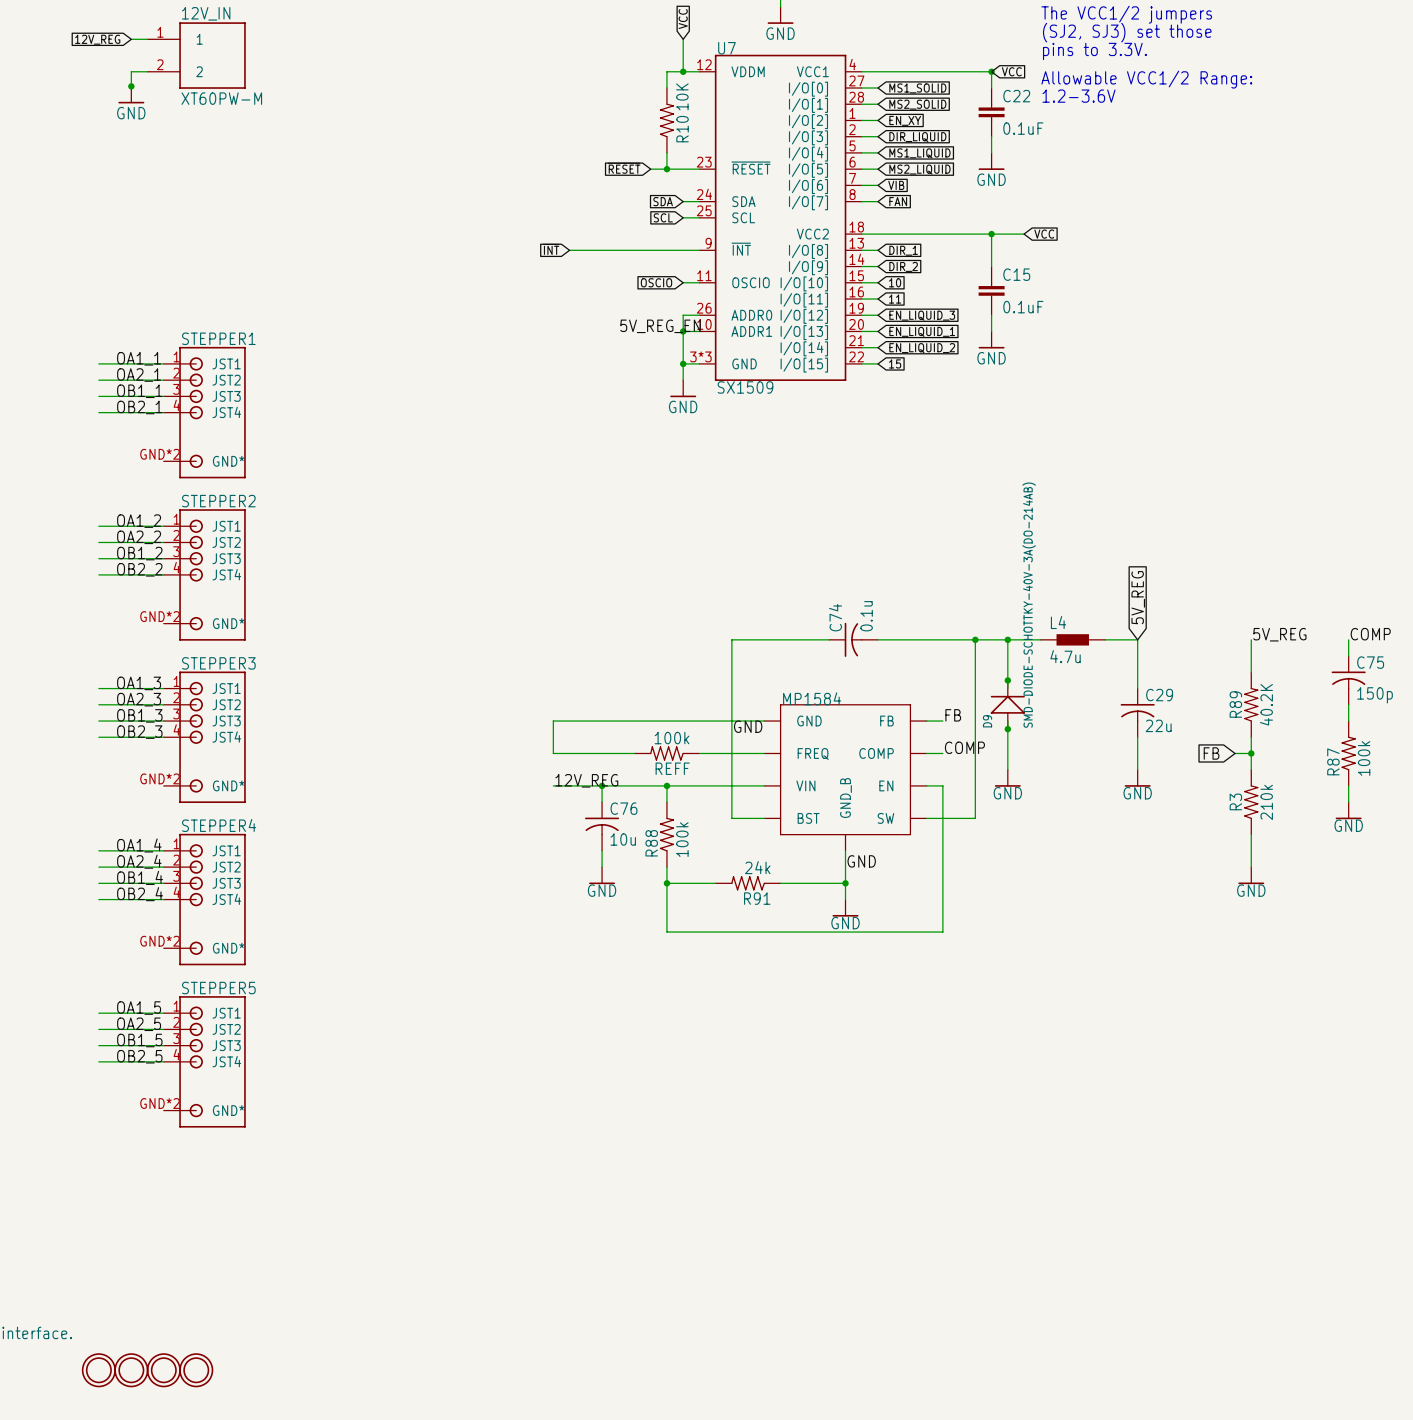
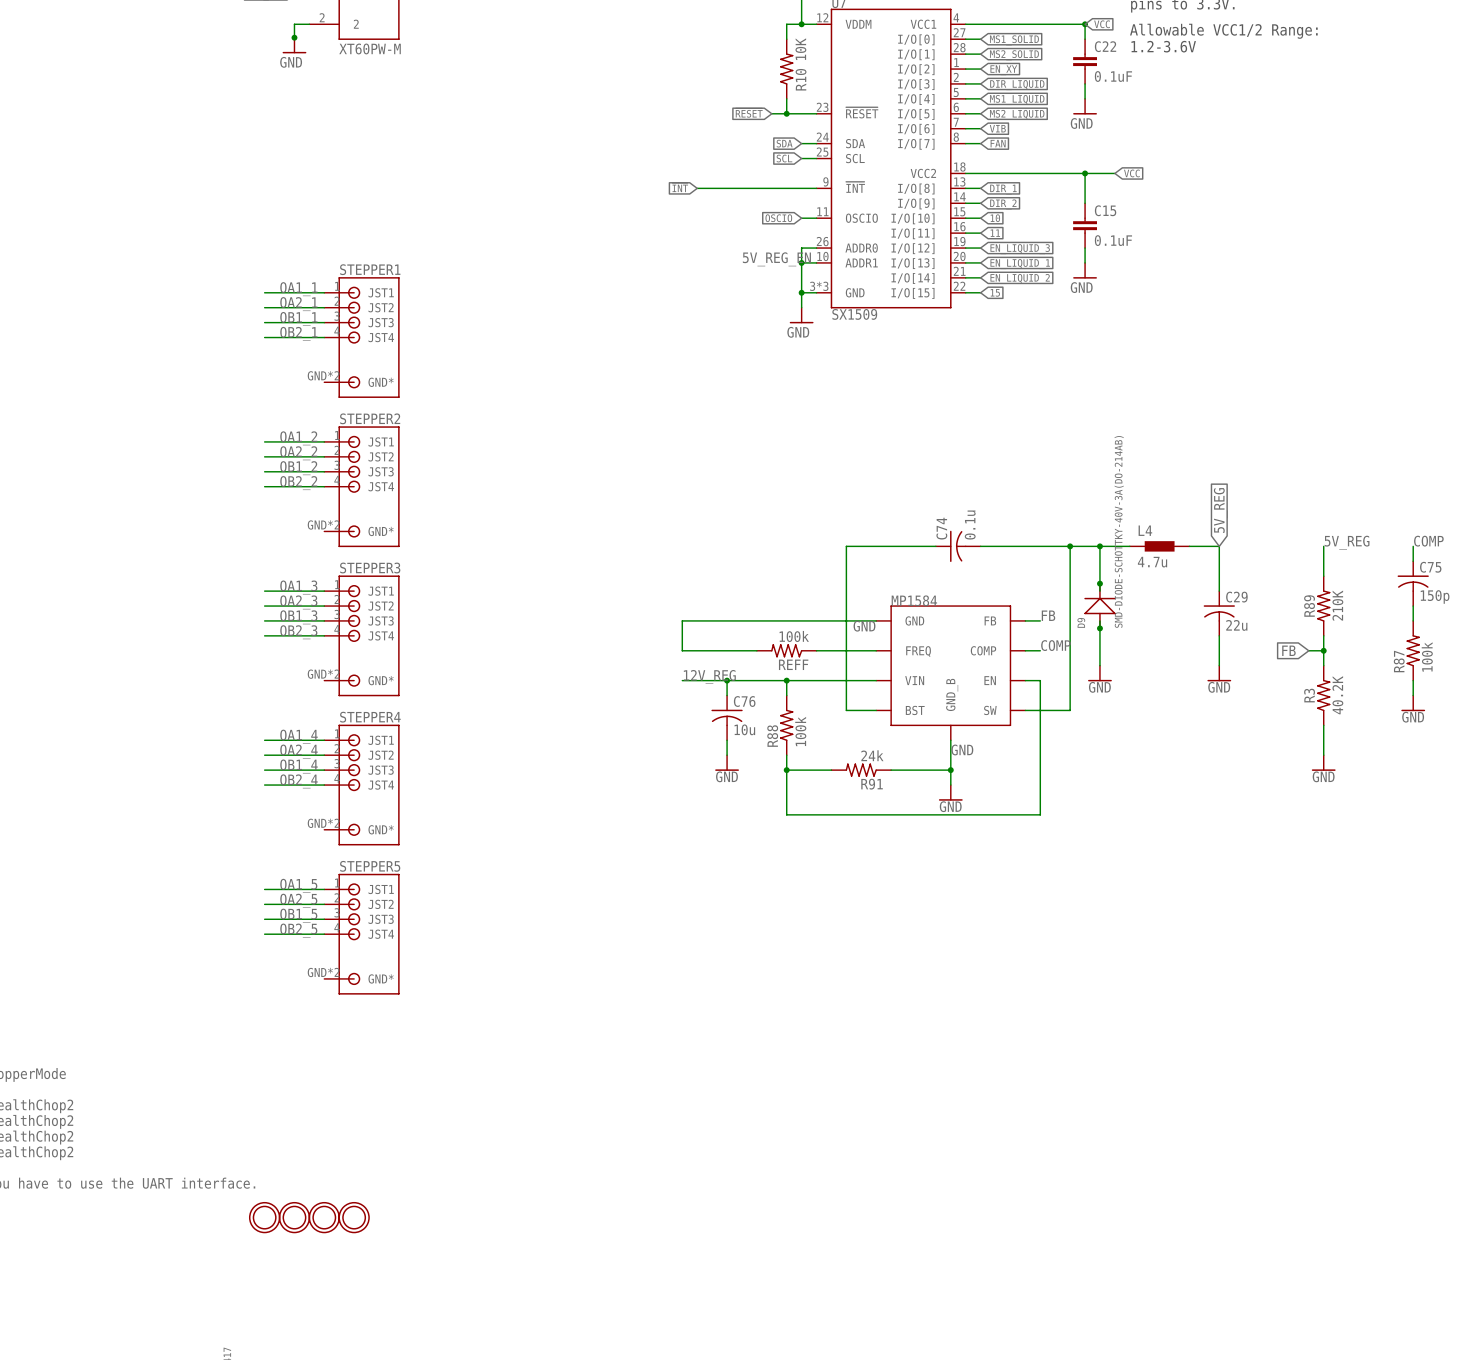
R89 value: 40.2K (1266, 704) -> 210K (1337, 605)
R3 value: 210k (1266, 802) -> 40.2K (1337, 695)

